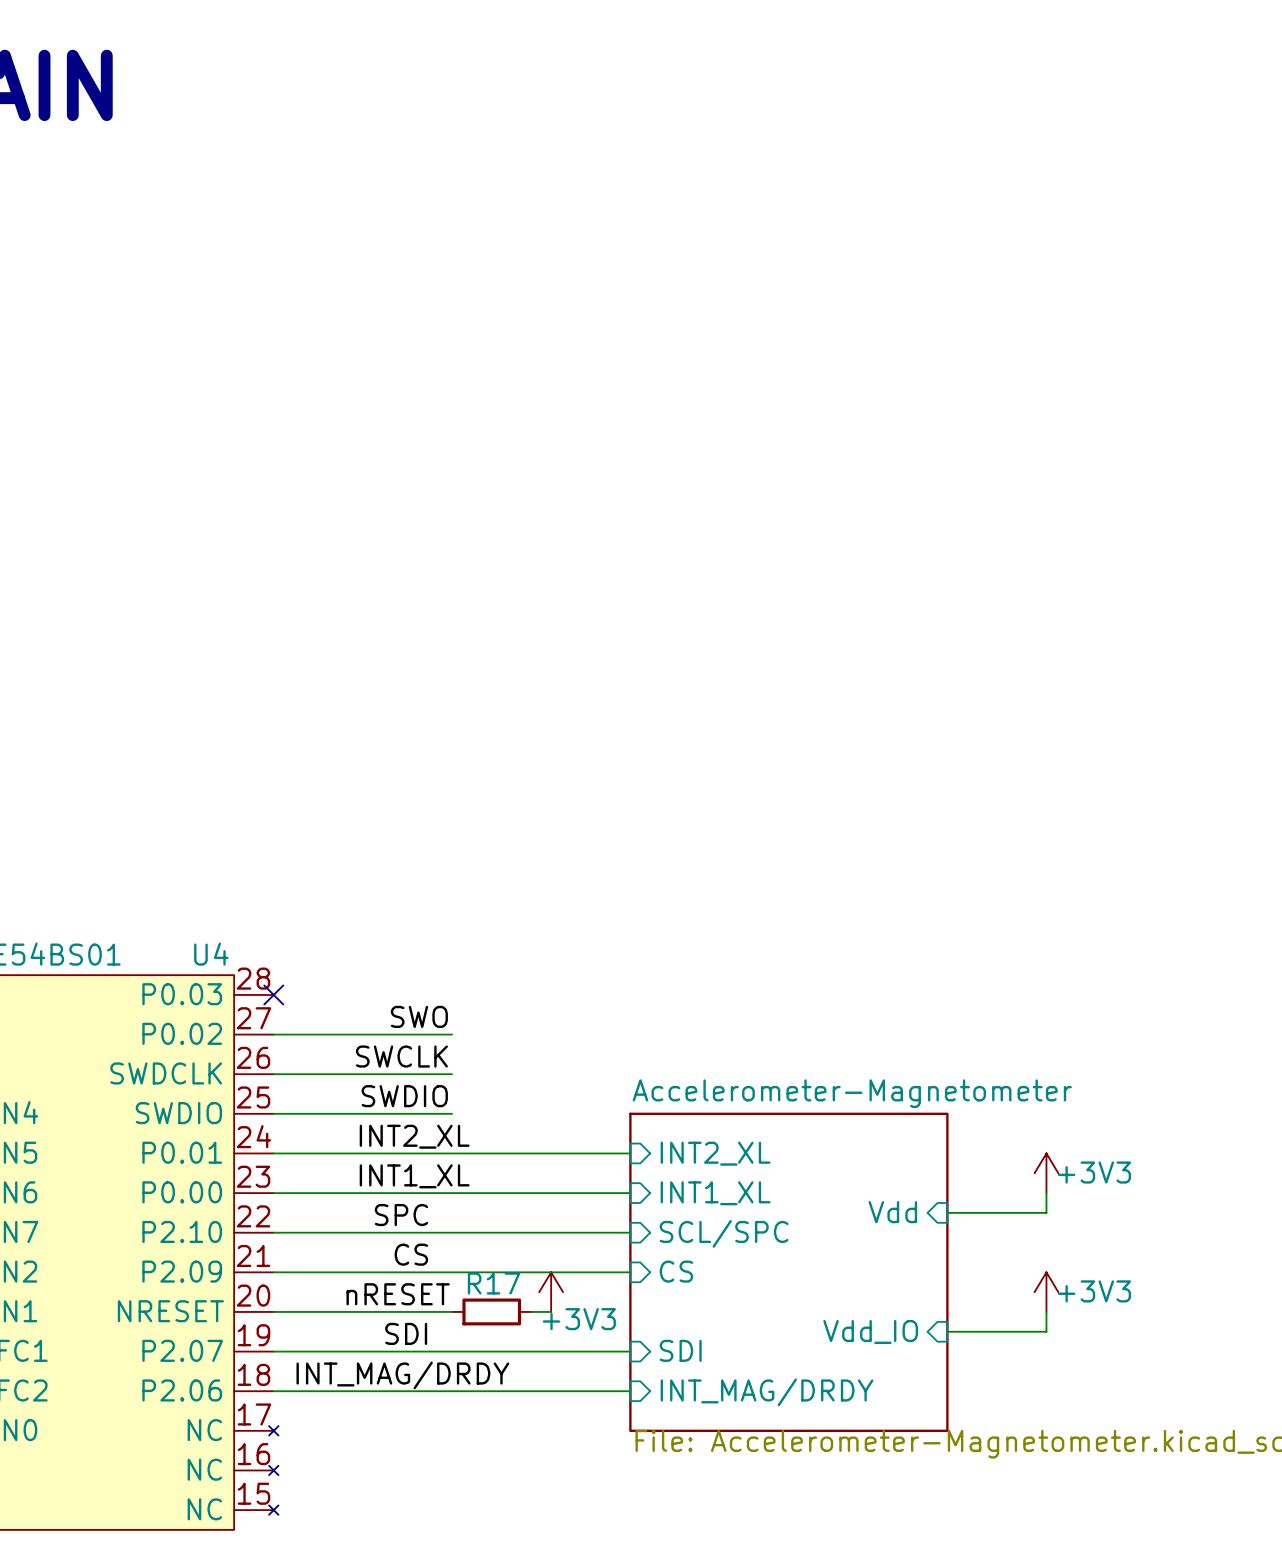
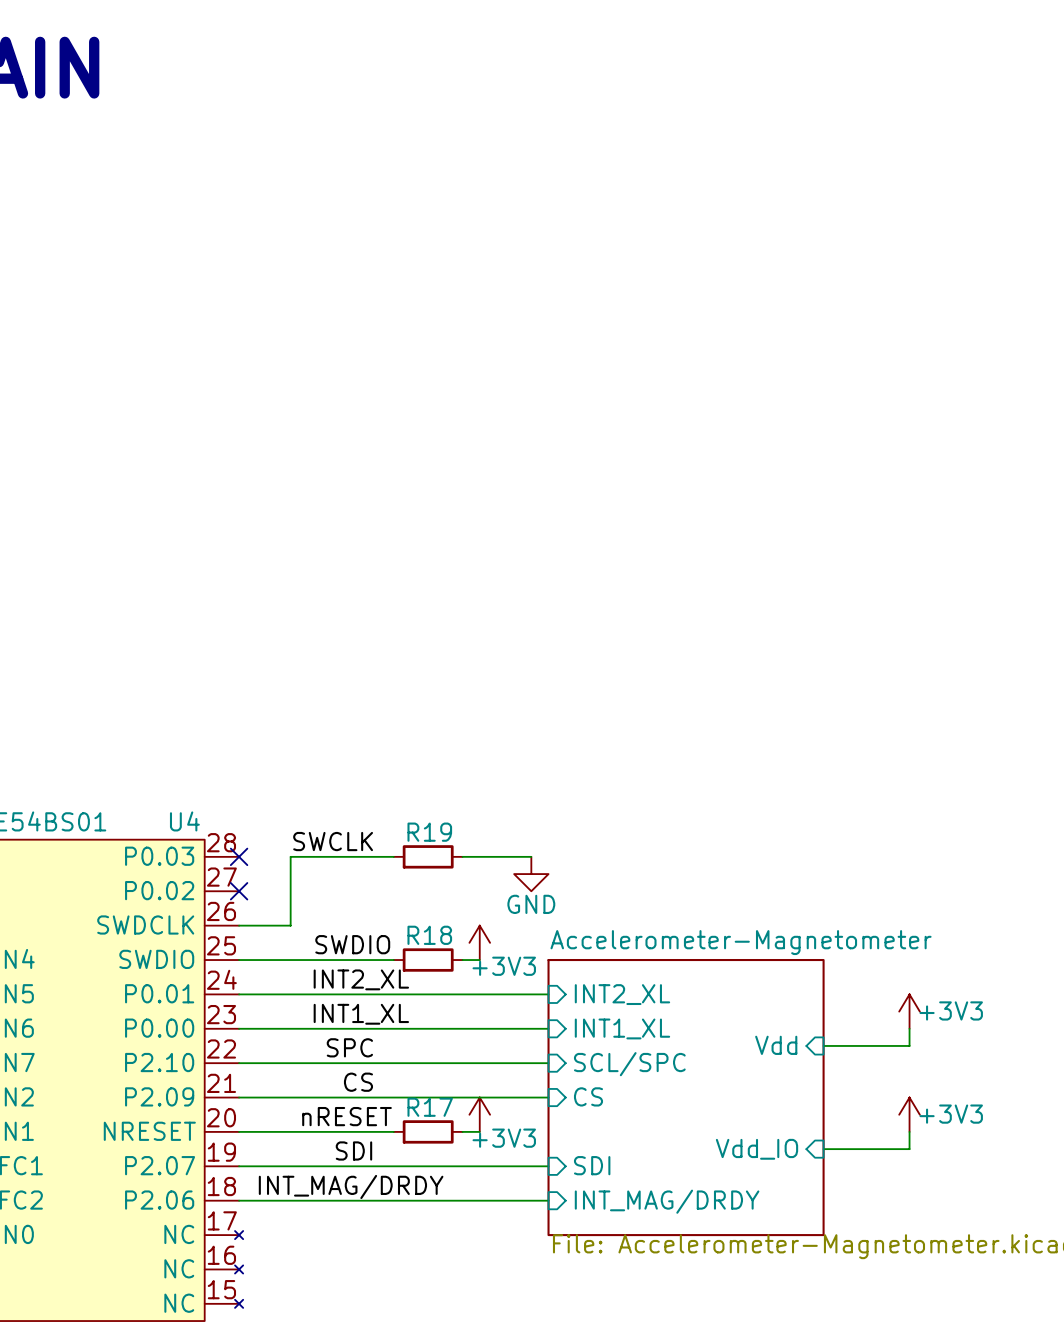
R19: none -> (428, 856)
wire: none -> (462, 856) (531, 856)
power symbol: none -> GND (531, 874)
label: SWO (419, 1016) -> none
wire: (273, 1034) (452, 1034) -> none
no-connect mark: none -> (239, 891)
label position: SWCLK (401, 1056) -> SWCLK (333, 841)
wire: (333, 1074) (452, 1074) -> (290, 925) (290, 856) (393, 856)
power symbol: none -> +3V3 (479, 942)
R18: none -> (428, 960)
wire: none -> (462, 960) (479, 960)

